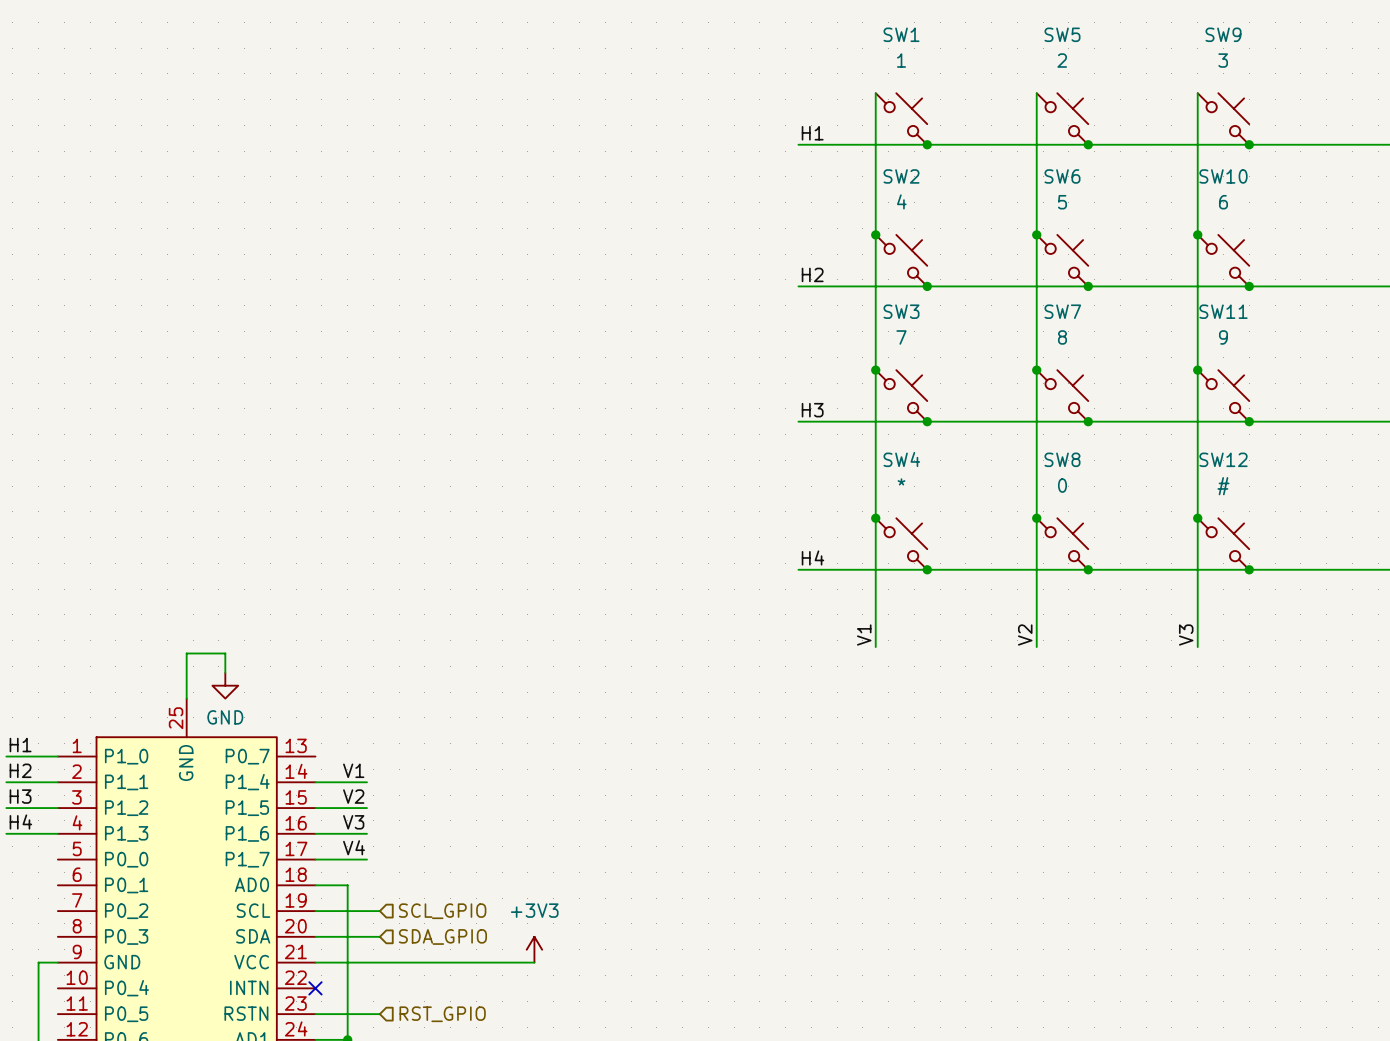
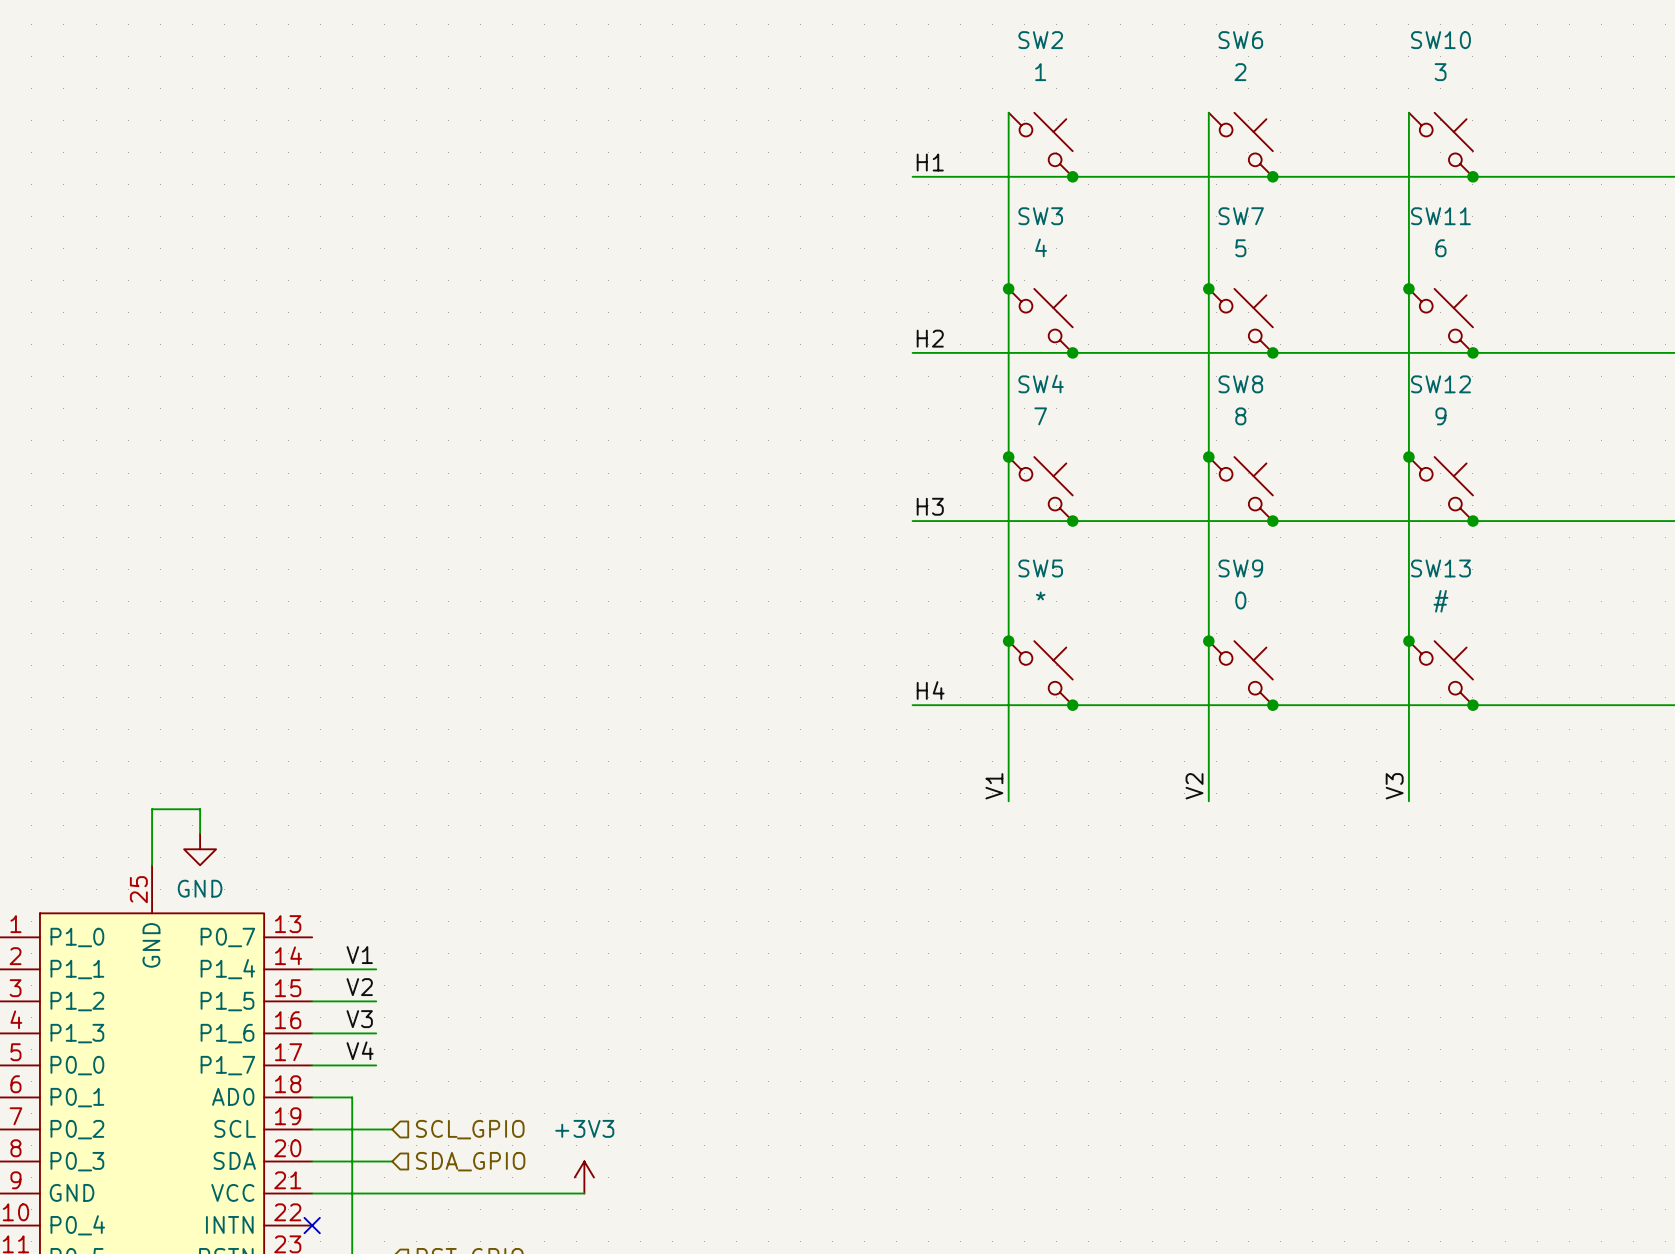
SW1 name: SW1 (901, 34) -> SW2 (1040, 40)
SW5 name: SW5 (1062, 34) -> SW6 (1240, 40)
SW9 name: SW9 (1223, 34) -> SW10 (1440, 40)
SW2 name: SW2 (901, 176) -> SW3 (1040, 216)
SW6 name: SW6 (1062, 176) -> SW7 (1241, 216)
SW10 name: SW10 (1223, 176) -> SW11 (1440, 216)
SW3 name: SW3 (901, 311) -> SW4 (1041, 383)
SW7 name: SW7 (1062, 311) -> SW8 (1240, 384)
SW11 name: SW11 (1223, 311) -> SW12 (1440, 384)
SW4 name: SW4 (901, 459) -> SW5 (1040, 568)
SW8 name: SW8 (1062, 459) -> SW9 (1240, 568)
SW12 name: SW12 (1223, 459) -> SW13 (1440, 568)

